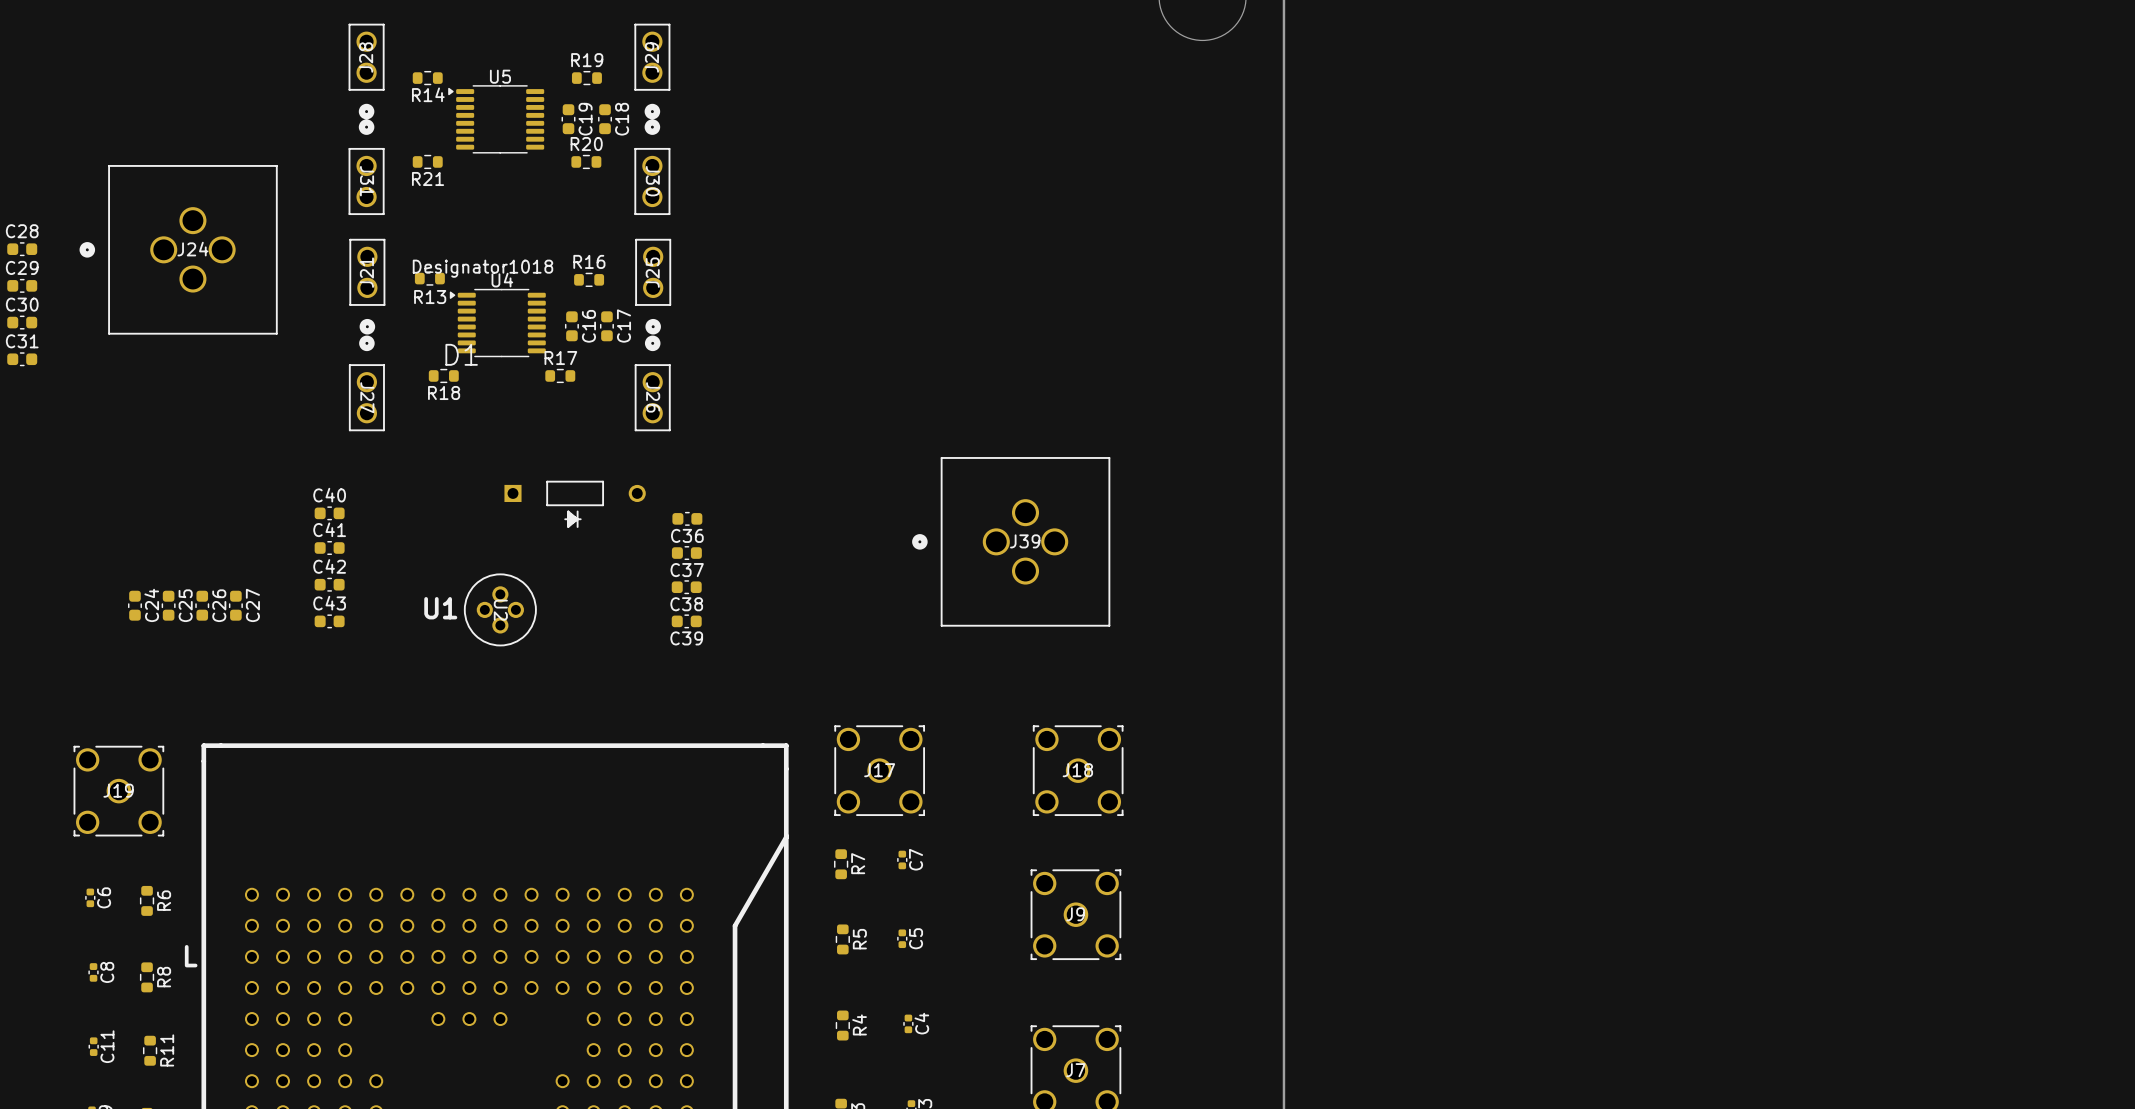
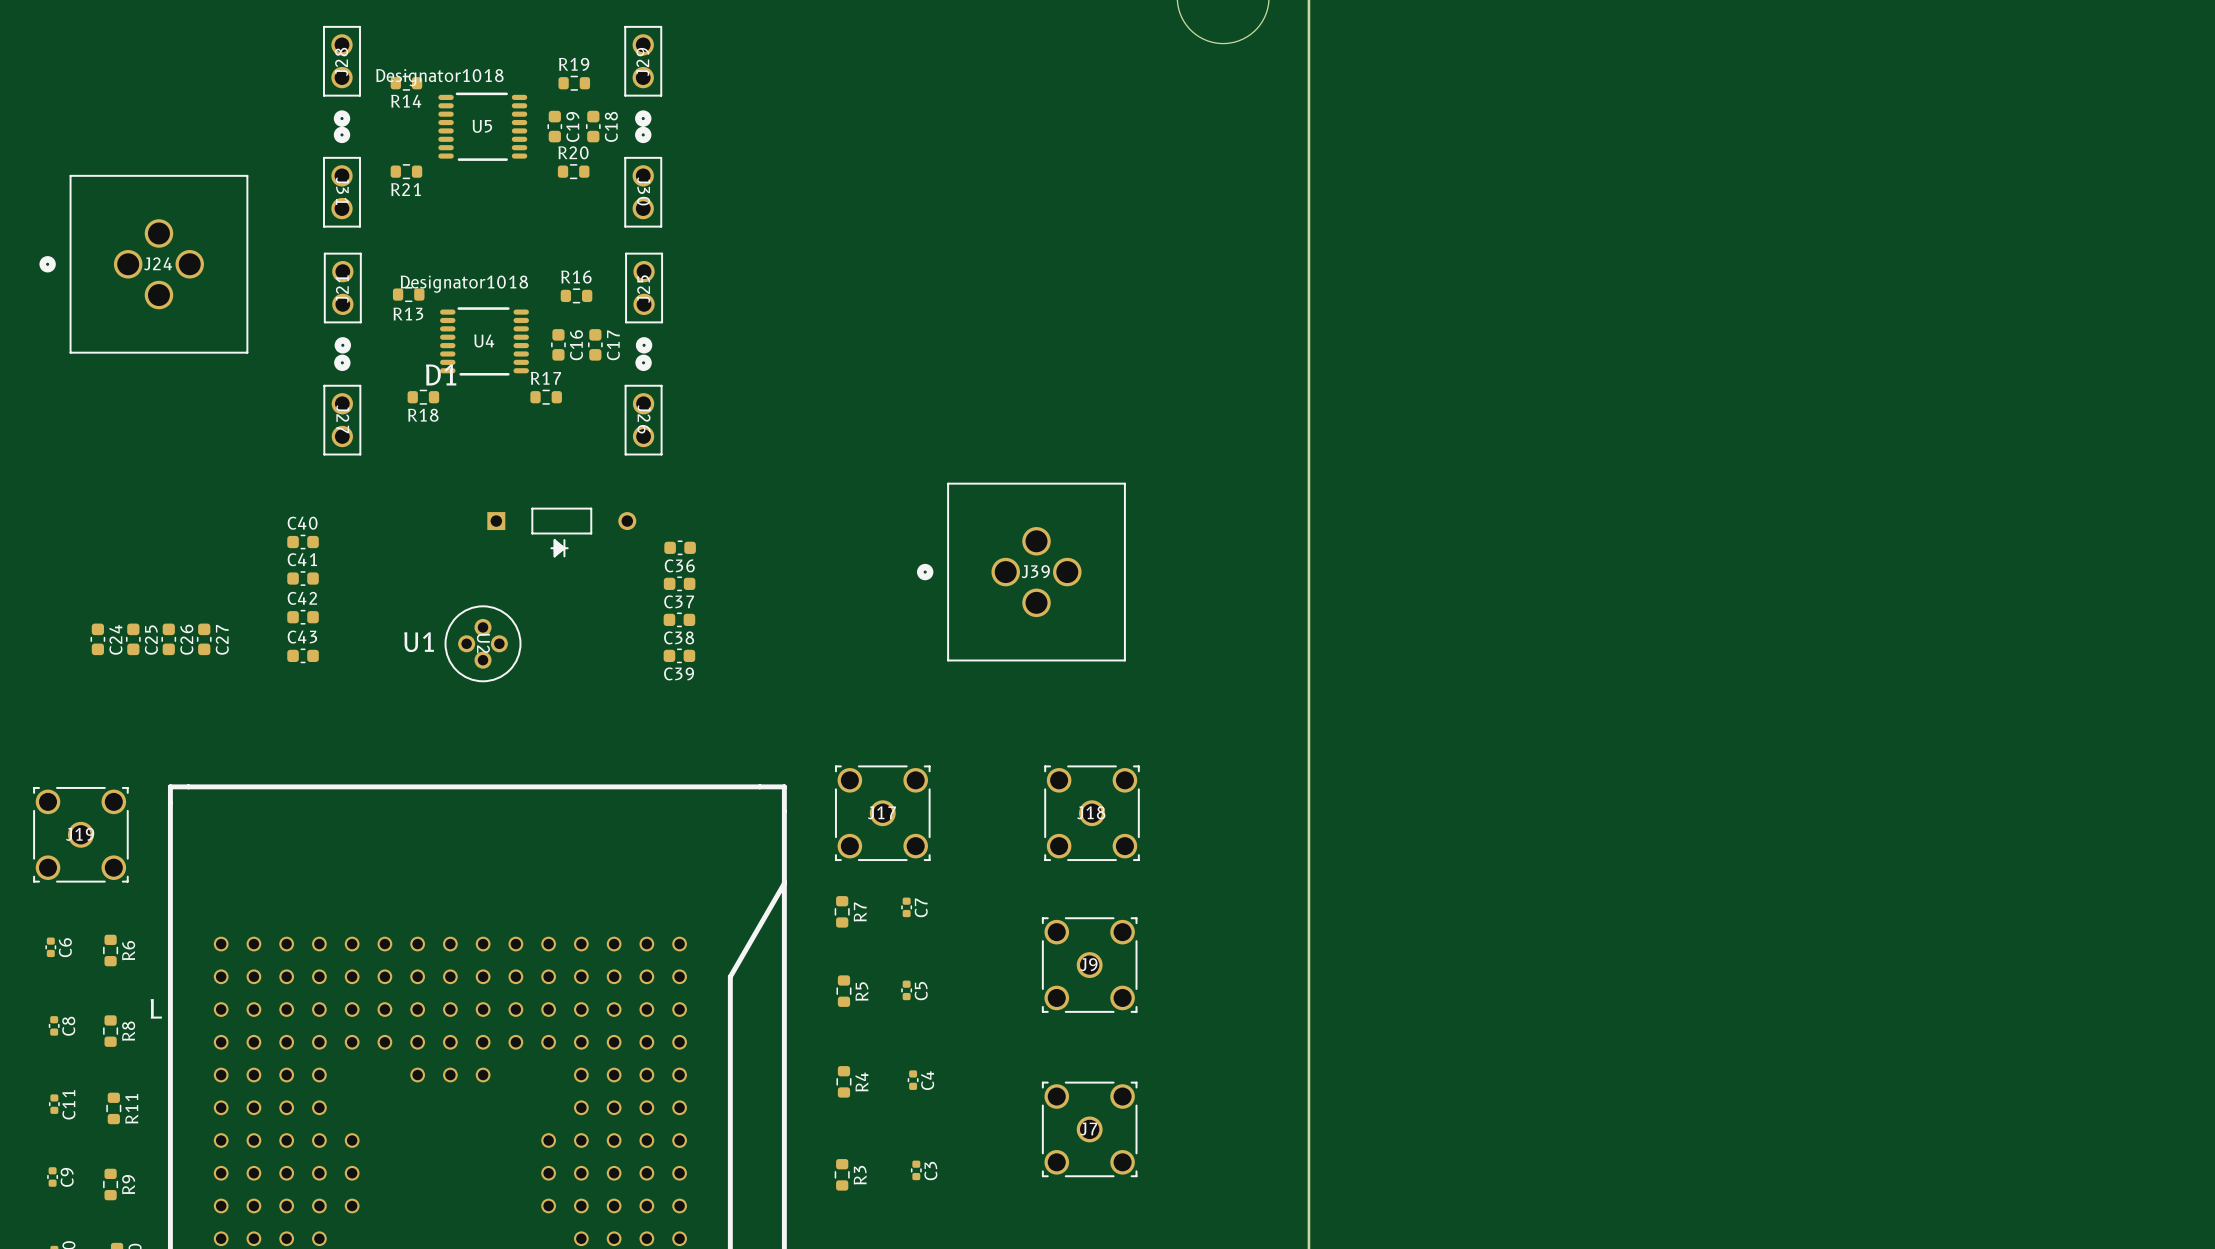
U5 name position: U5 (500, 76) -> U5 (482, 126)
U5 footprint: [448, 85, 545, 154] -> [438, 92, 528, 161]
U4 name position: U4 (502, 280) -> U4 (484, 341)
U4 footprint: [449, 288, 546, 358] -> [440, 307, 529, 376]

